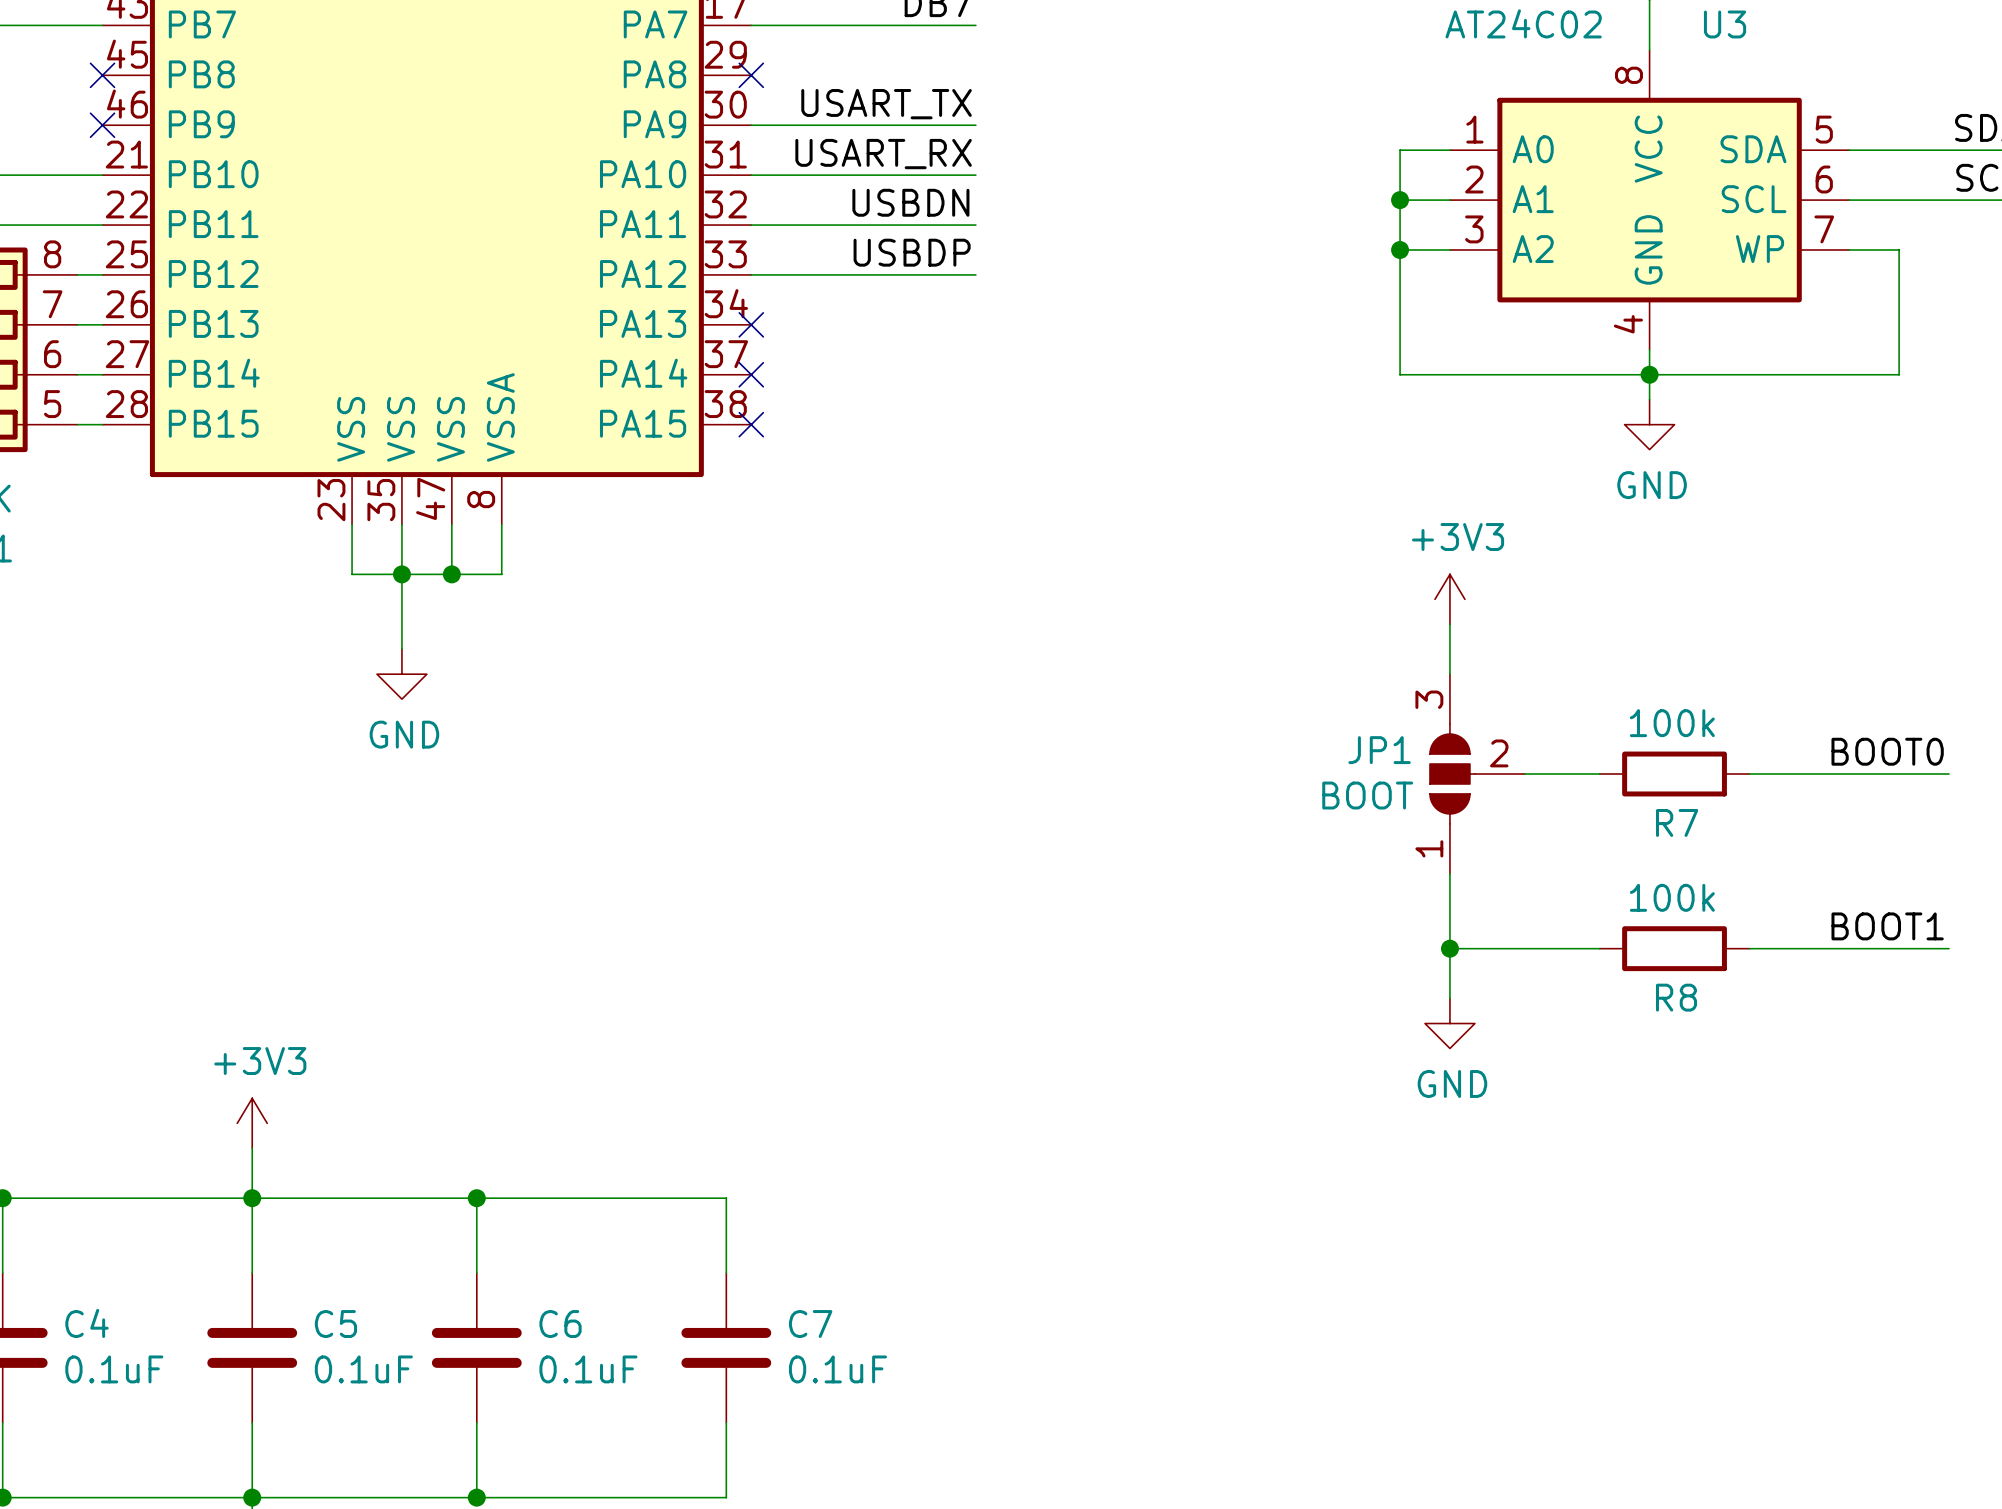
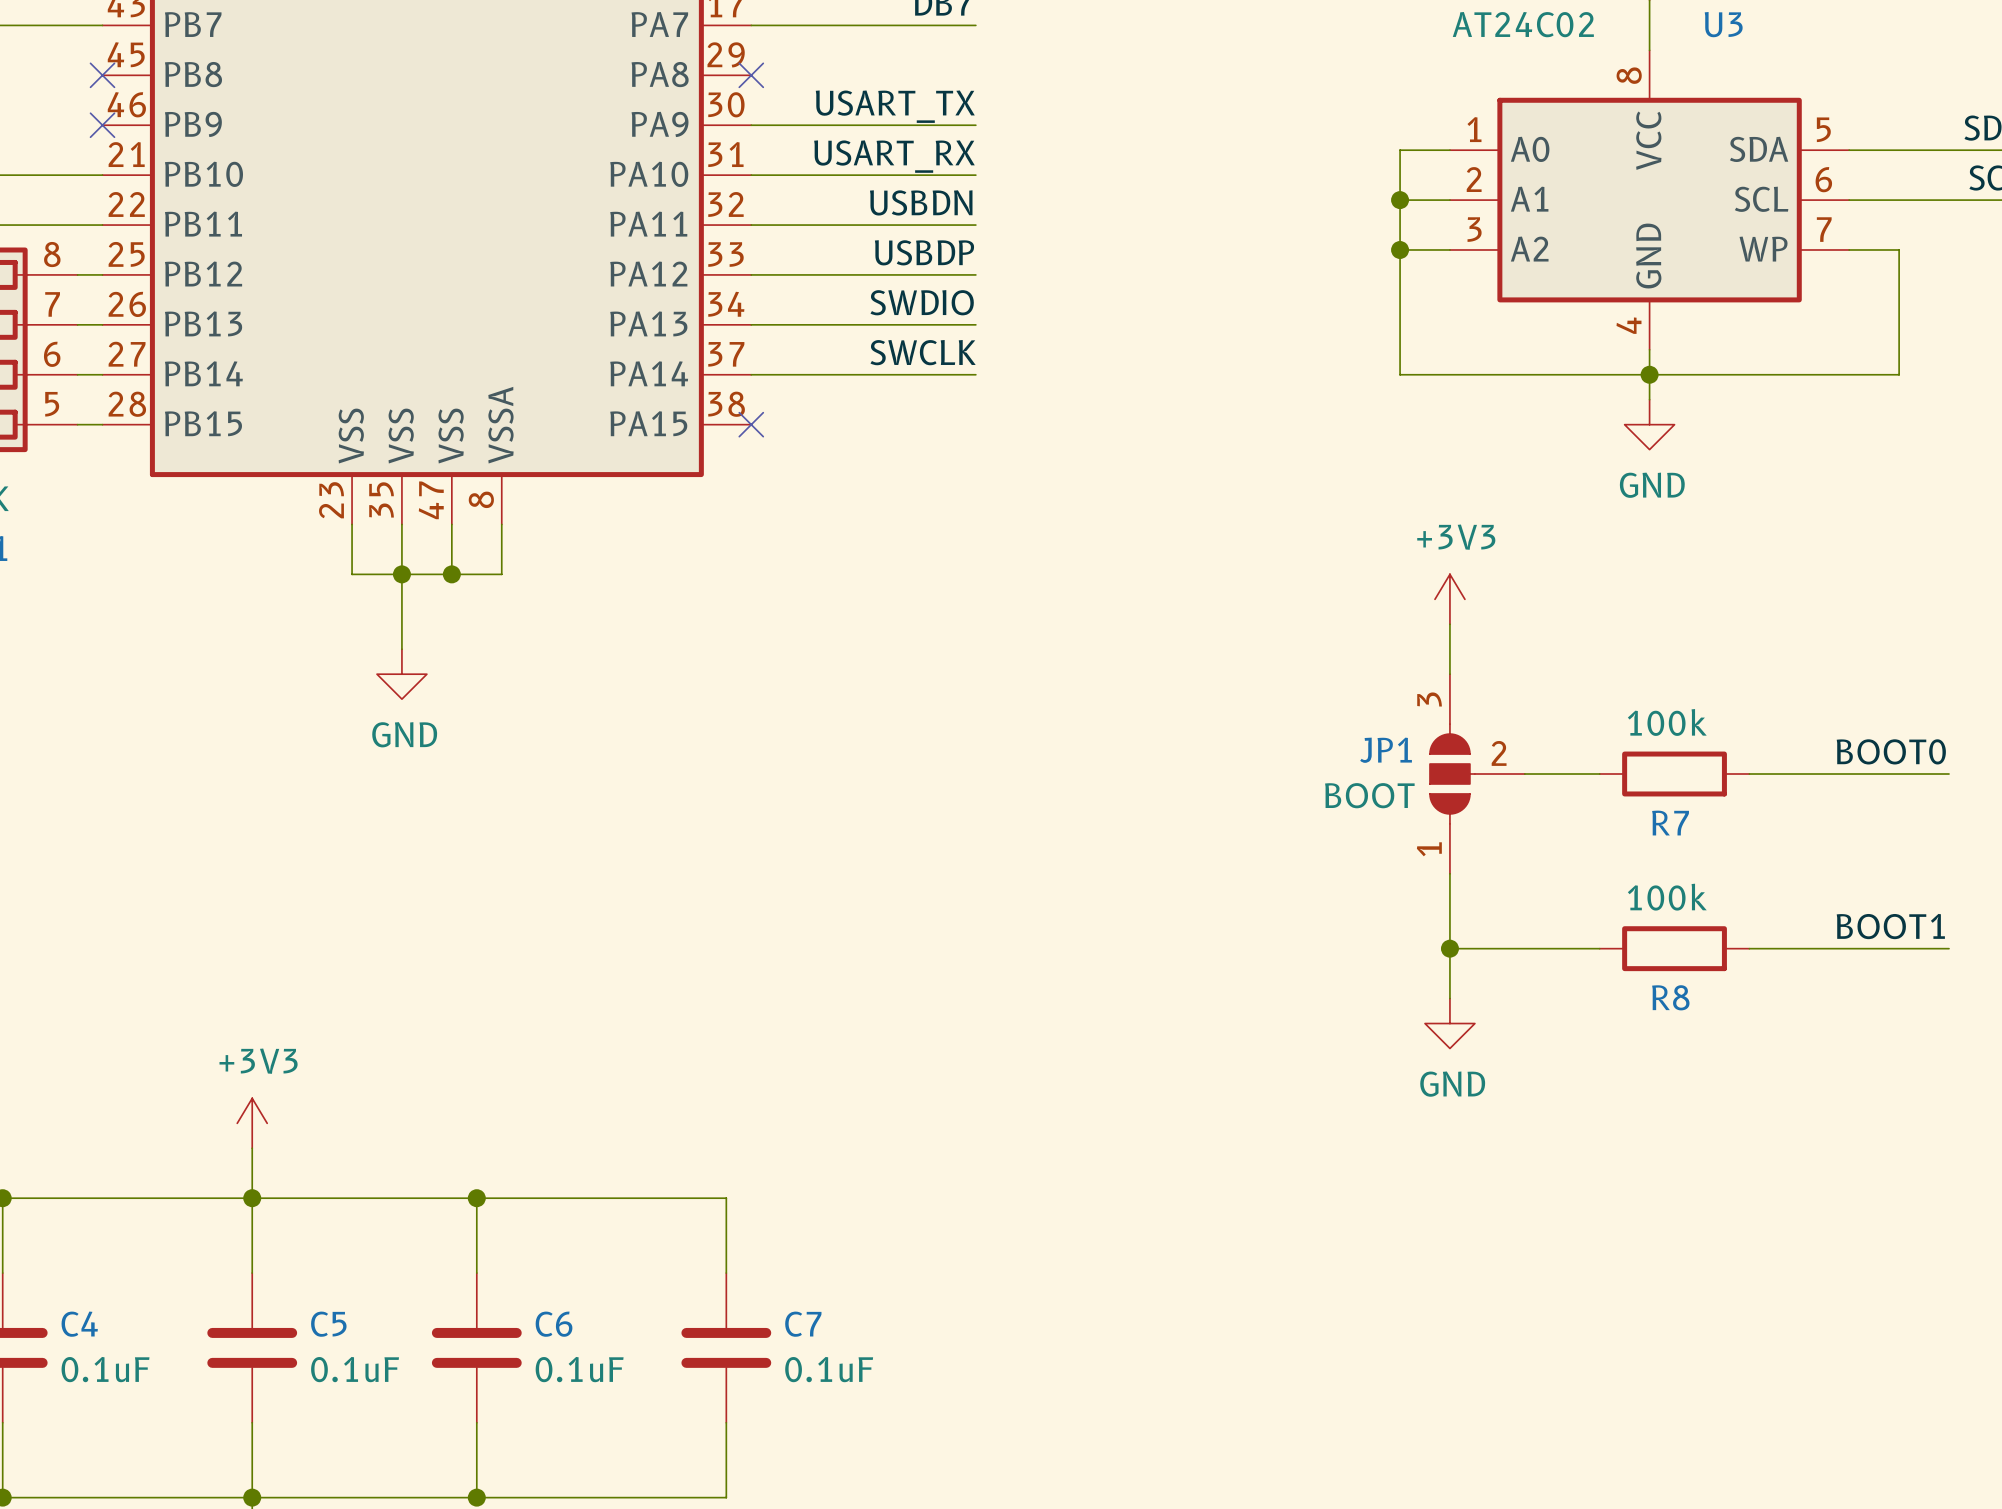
label: none -> SWDIO (922, 302)
wire: none -> (751, 324) (975, 324)
no-connect mark: (751, 324) -> none
label: none -> SWCLK (923, 352)
wire: none -> (751, 374) (975, 374)
no-connect mark: (751, 374) -> none

